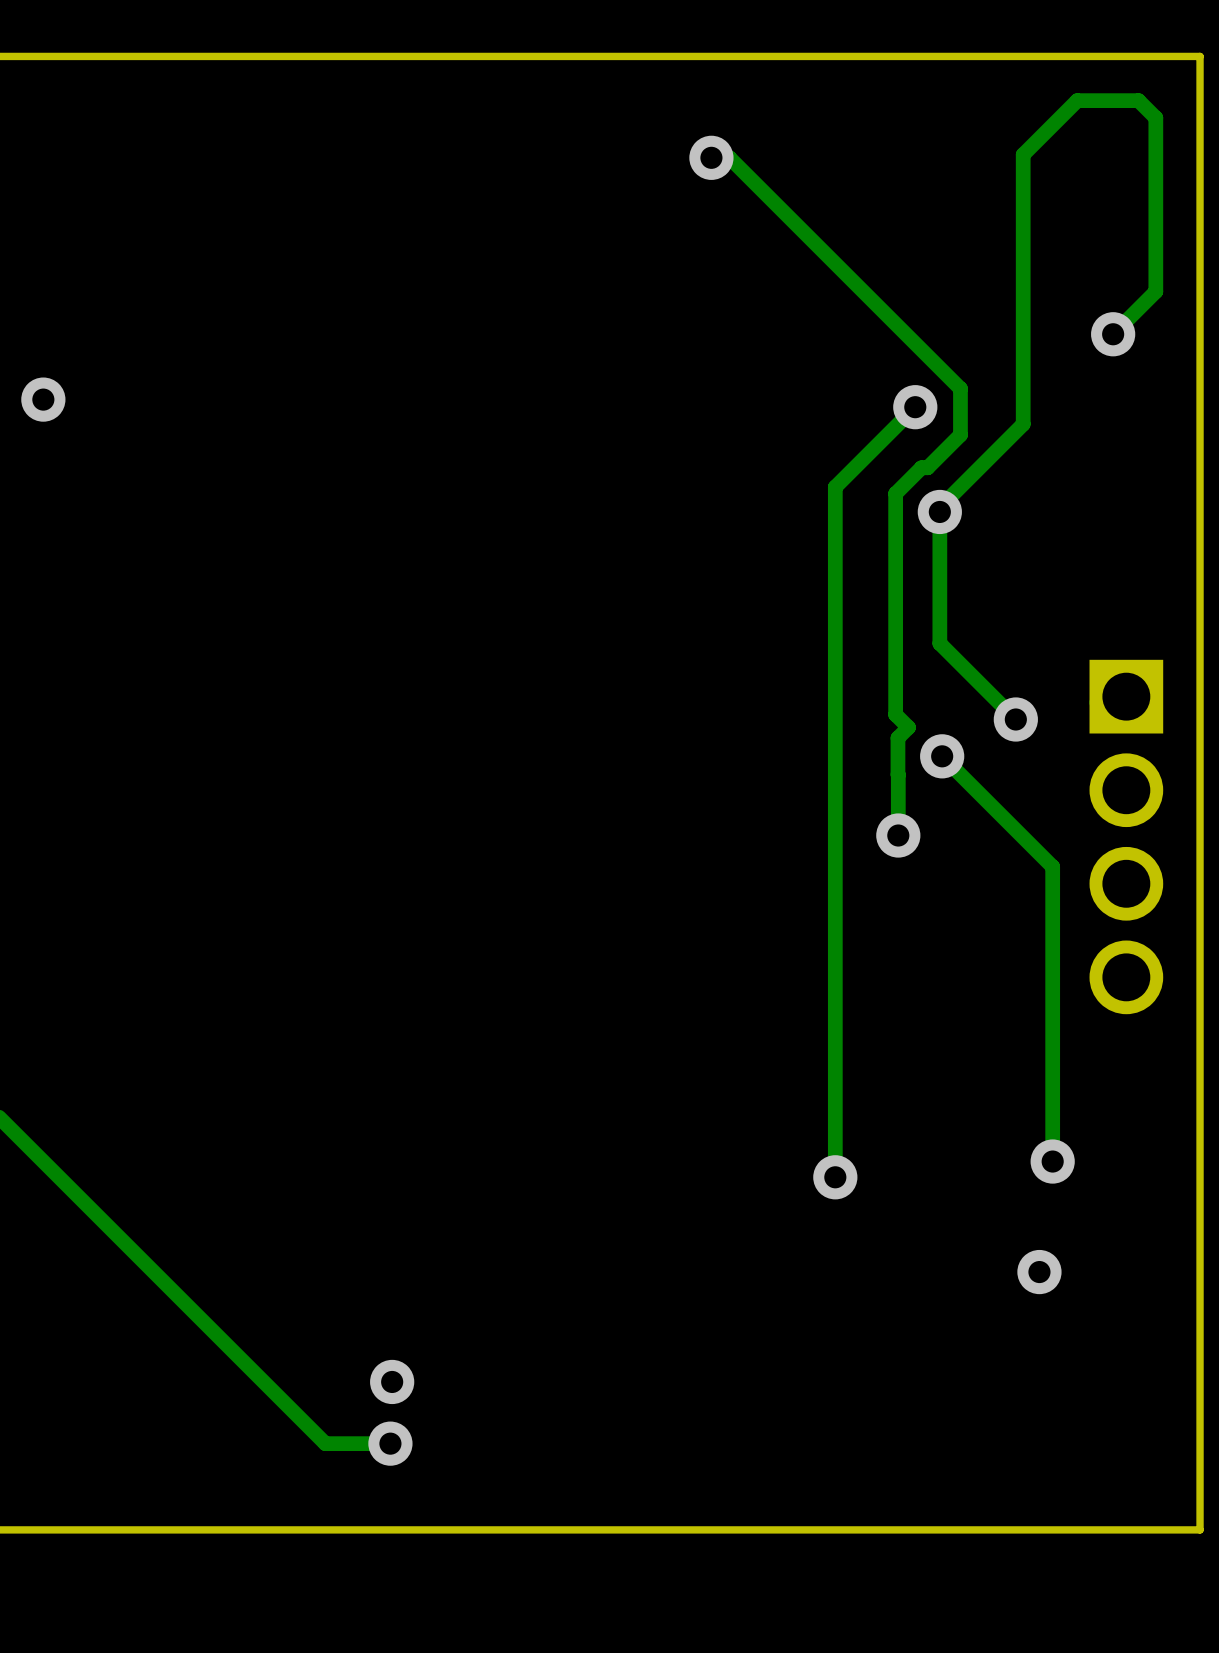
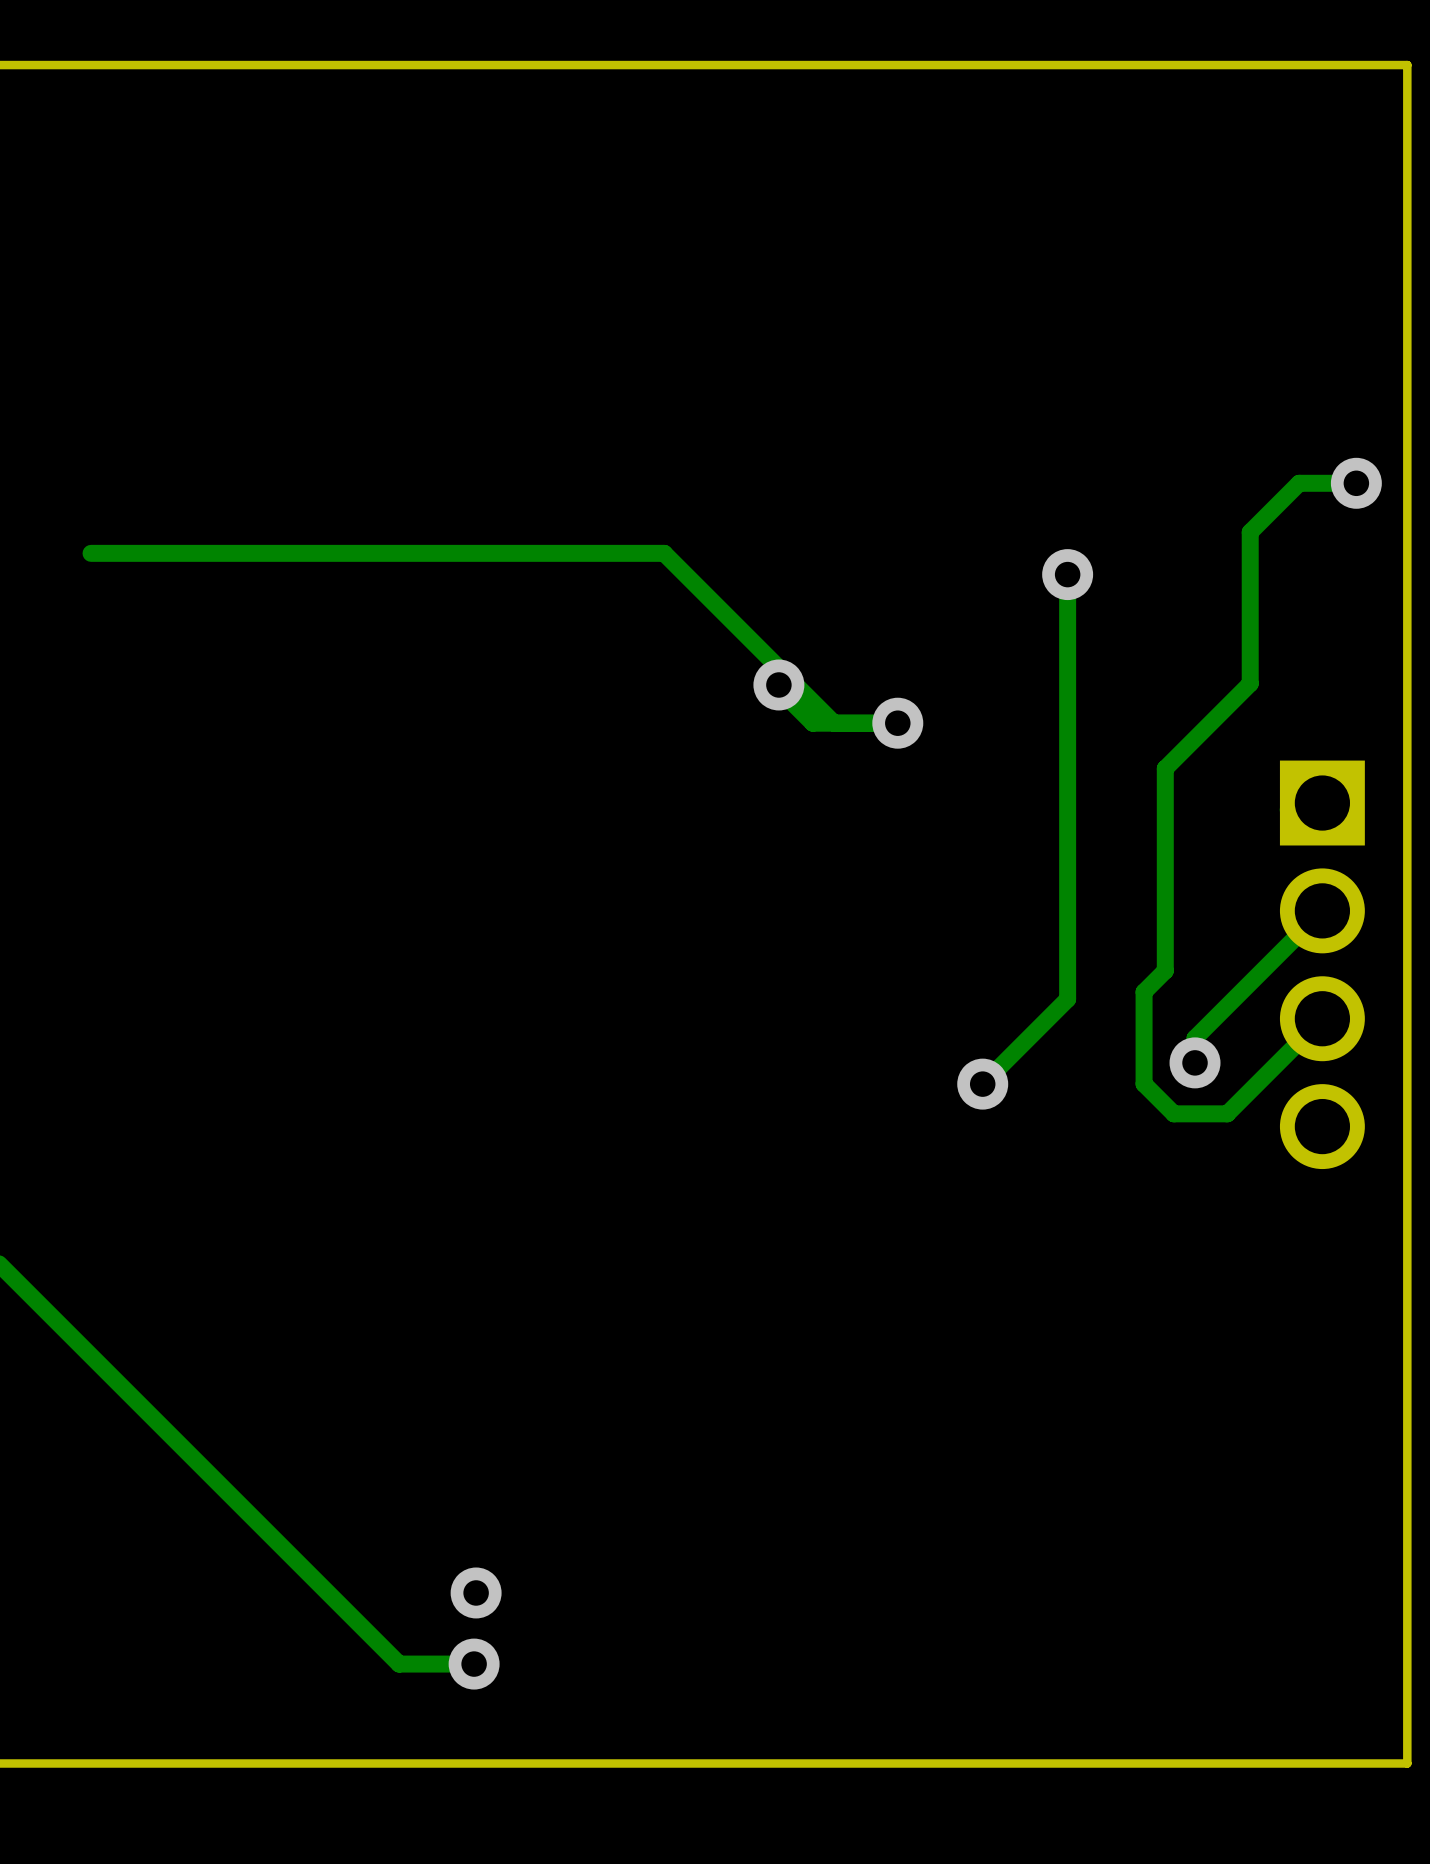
track: (711, 157) (729, 157) (960, 388) (960, 434) (927, 467) (921, 467) (895, 493) (895, 714) (908, 727) (897, 738) (898, 835) -> none
via: (711, 157) -> none
track: (1113, 334) (1155, 291) (1155, 117) (1138, 100) (1077, 100) (1023, 154) (1023, 424) (939, 507) (939, 643) (1015, 719) -> none
via position: (1113, 334) -> (1356, 483)
via: (43, 399) -> none
track: (915, 407) (835, 487) (835, 1177) -> none
via: (915, 407) -> none
track: none -> (1356, 483) (1299, 483) (1250, 532) (1250, 683) (1165, 768) (1165, 970) (1144, 992) (1144, 1083) (1173, 1113) (1227, 1113) (1322, 1018)
track: none -> (91, 553) (664, 553) (834, 723)
track: none -> (1067, 574) (1067, 999) (982, 1084)
via position: (939, 511) -> (1067, 574)
track: none -> (778, 684) (778, 689) (812, 723) (897, 723)
via: none -> (778, 684)
via: none -> (897, 723)
via: (1015, 719) -> none
track: (932, 756) (942, 756) (1052, 866) (1052, 1161) -> none
via: (942, 756) -> none
track: none -> (1322, 910) (1195, 1038) (1195, 1062)
via: (898, 835) -> none
via: none -> (1195, 1062)
via: none -> (982, 1084)
via: (1052, 1161) -> none
via: (835, 1177) -> none
via: (1039, 1272) -> none

